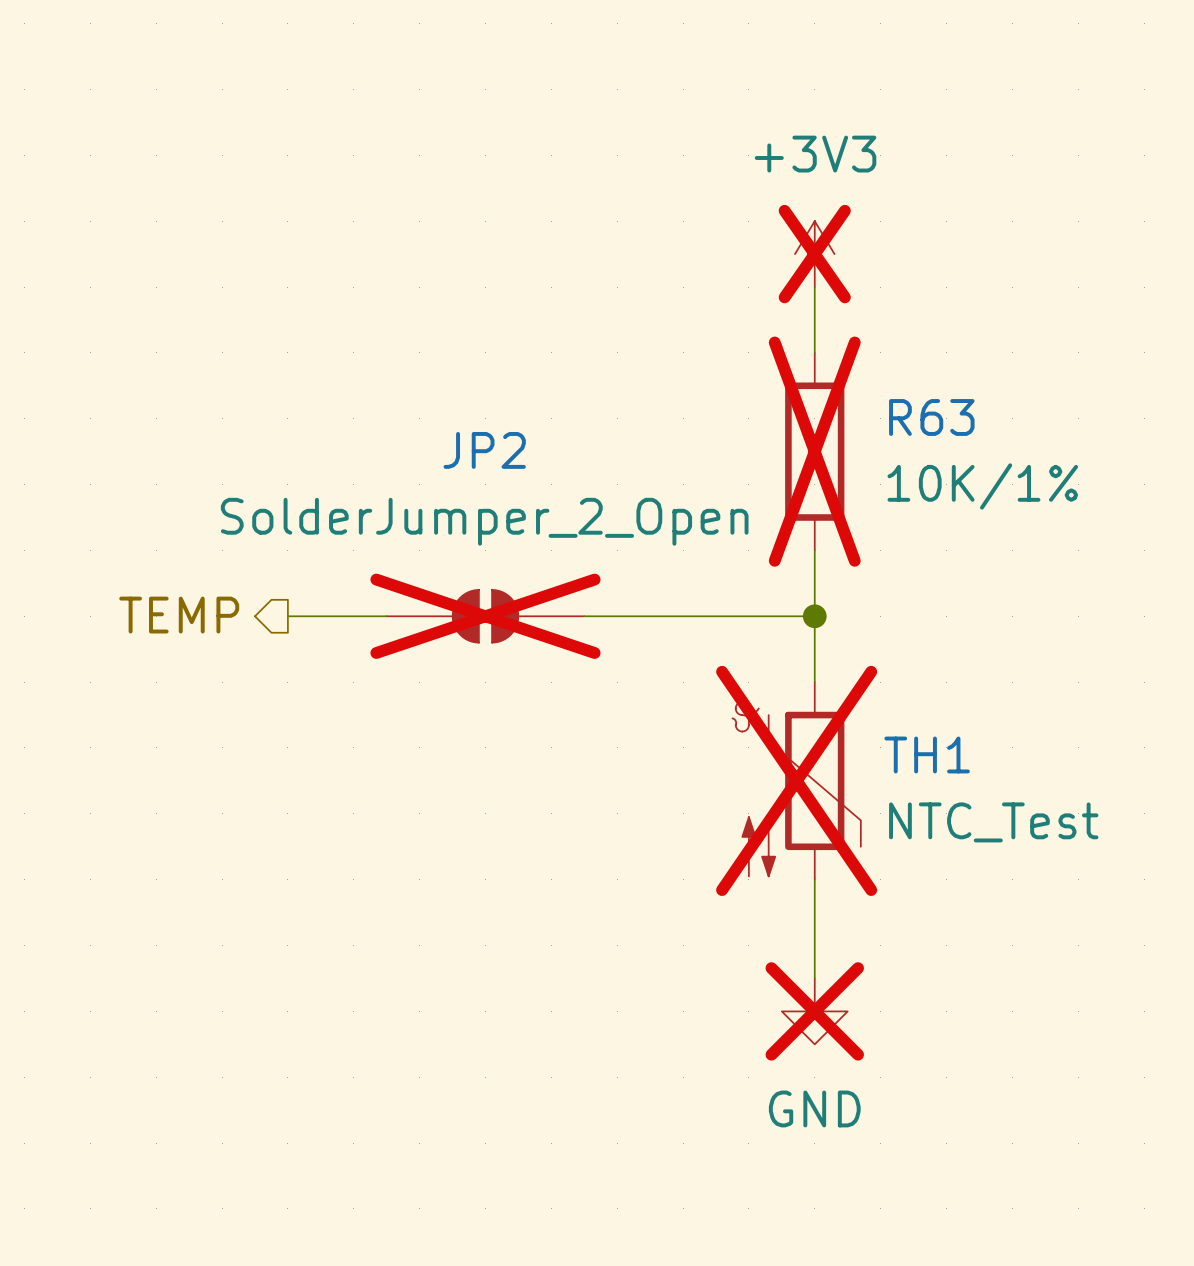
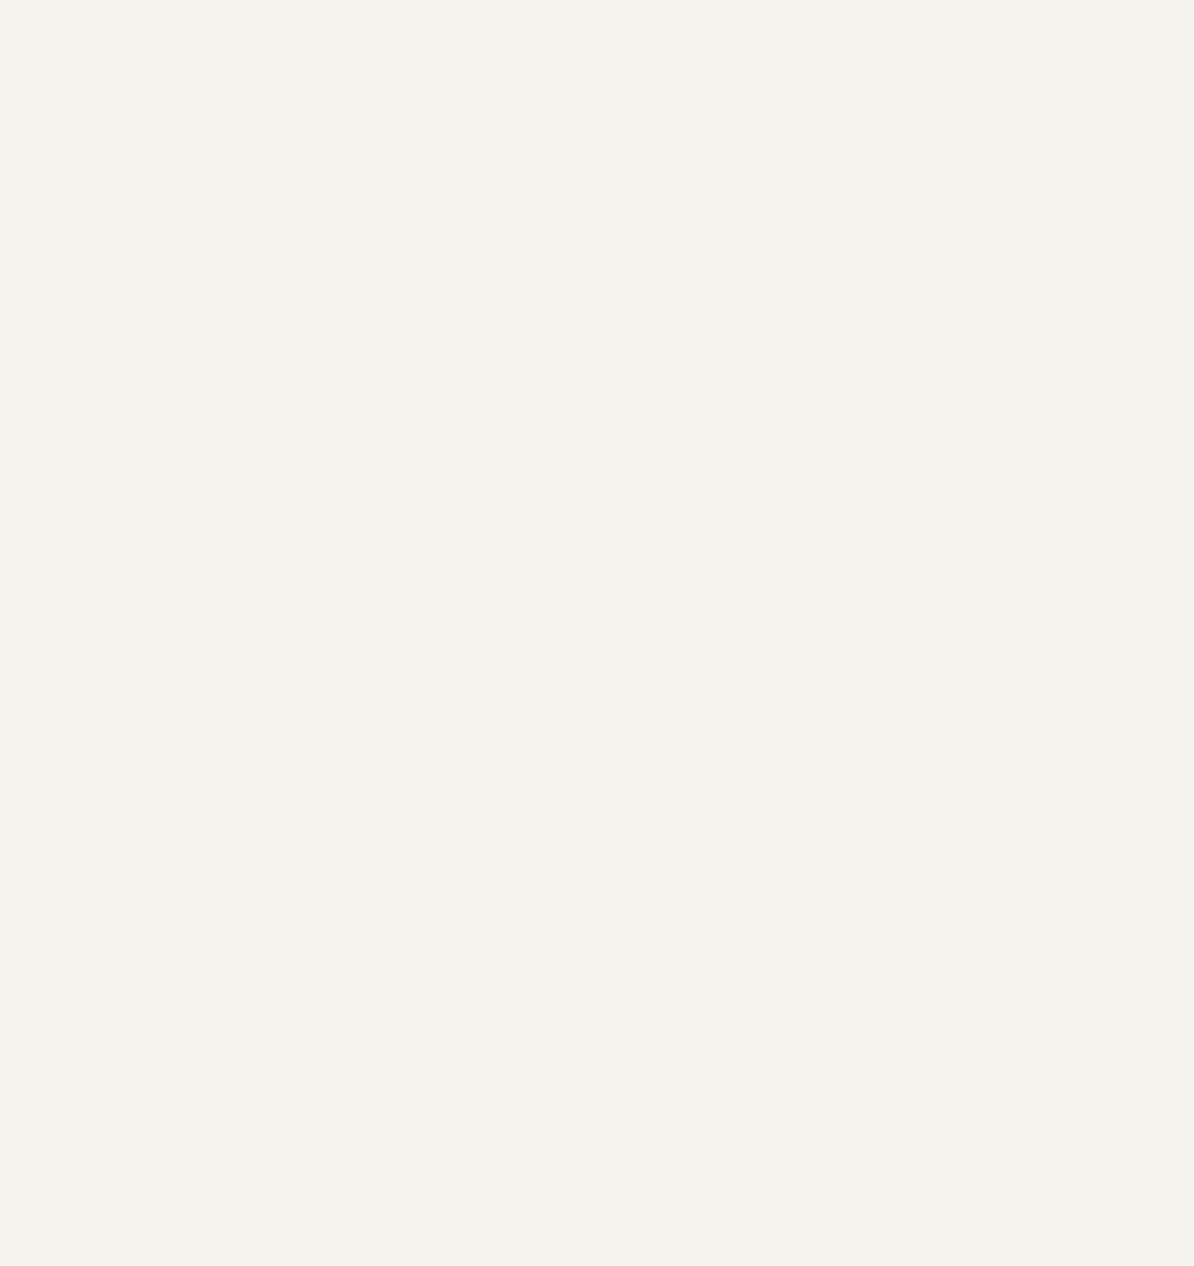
power symbol: +3V3 (814, 254) -> none
wire: (814, 287) (814, 352) -> none
R63: 10K/1% (814, 451) -> none
wire: (814, 550) (814, 682) -> none
hierarchical label: TEMP (179, 615) -> none
wire: (287, 616) (386, 616) -> none
JP2: SolderJumper_2_Open (485, 616) -> none
wire: (584, 616) (814, 616) -> none
junction: (814, 616) -> none
TH1: NTC_Test (796, 780) -> none
wire: (814, 879) (814, 978) -> none
power symbol: GND (814, 1011) -> none

